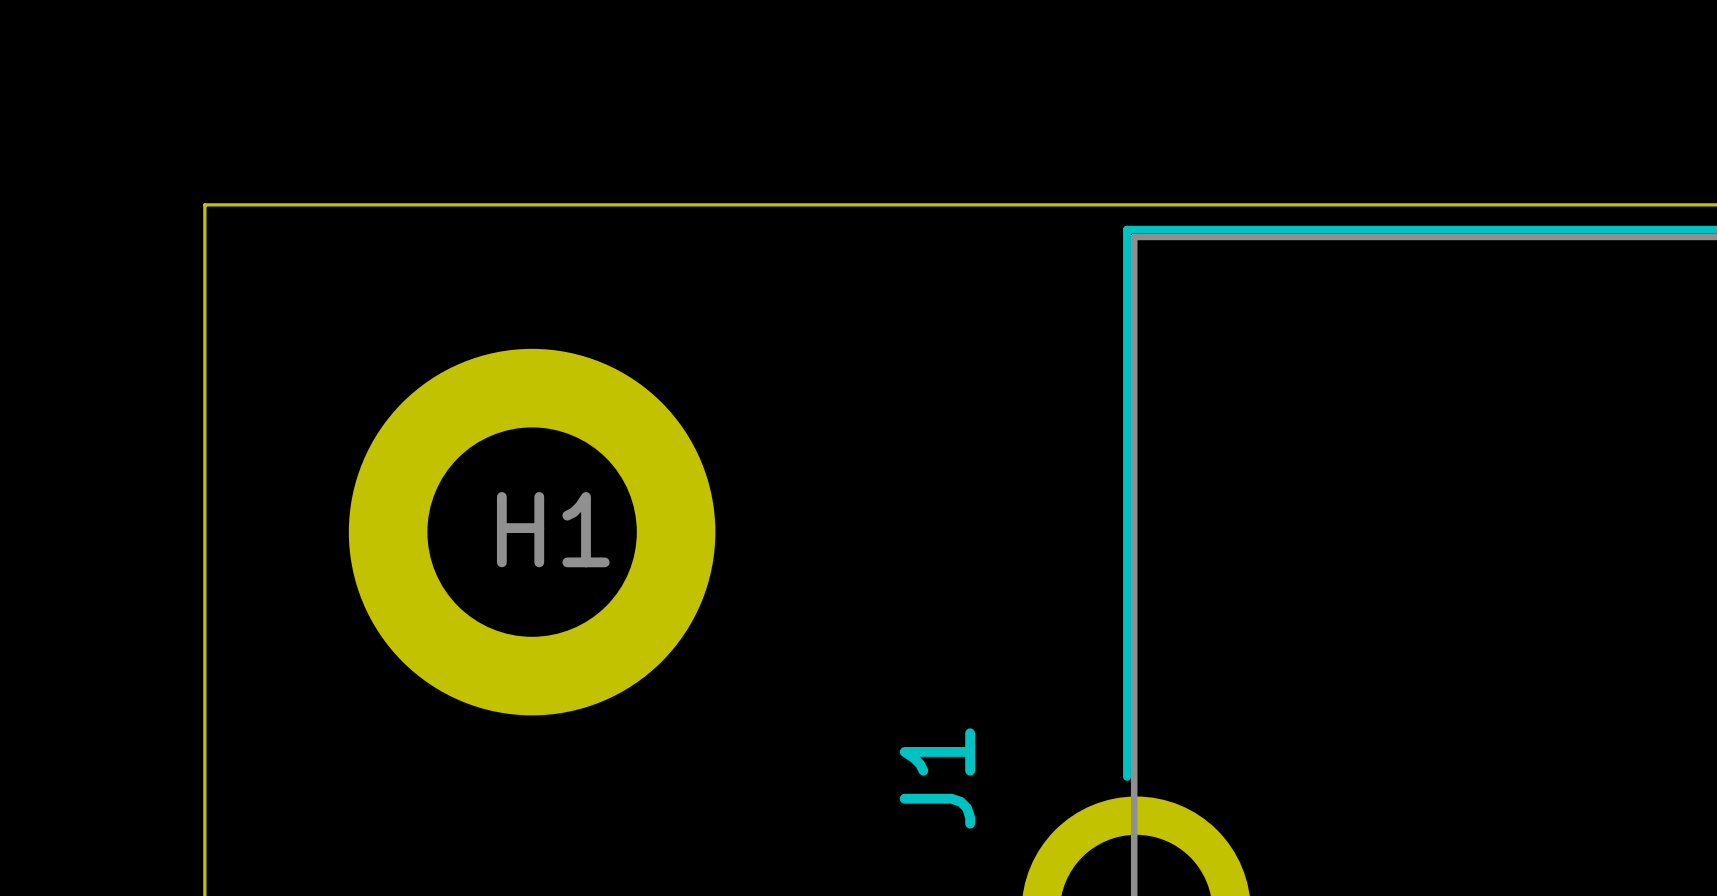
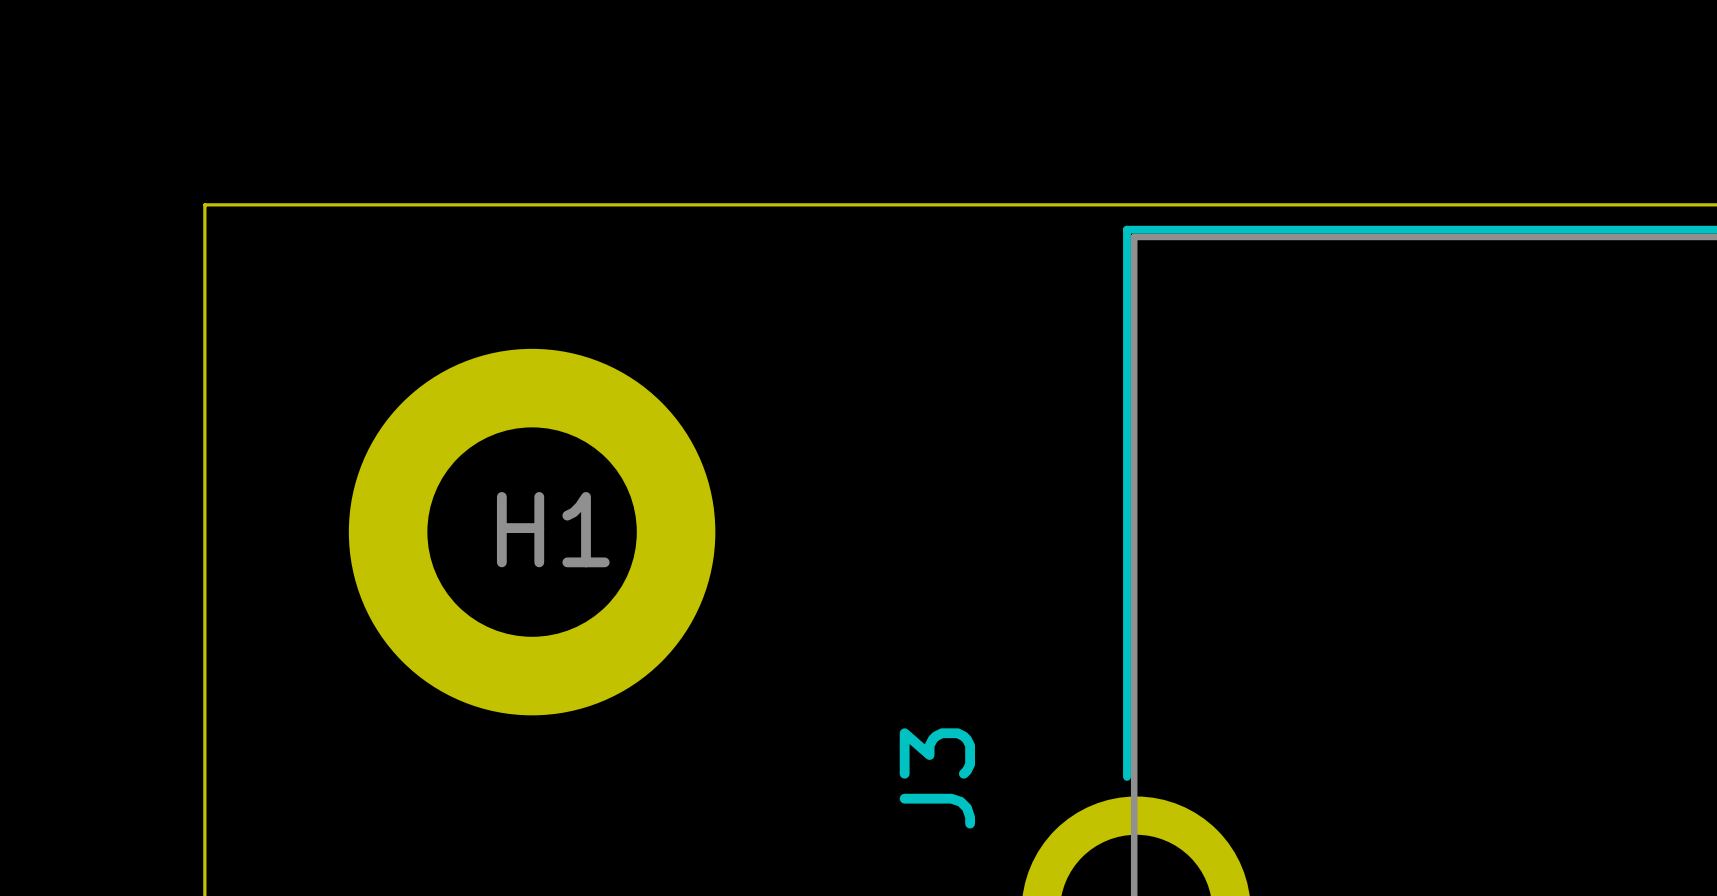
J1 name: J1 (937, 778) -> J3 (937, 778)

